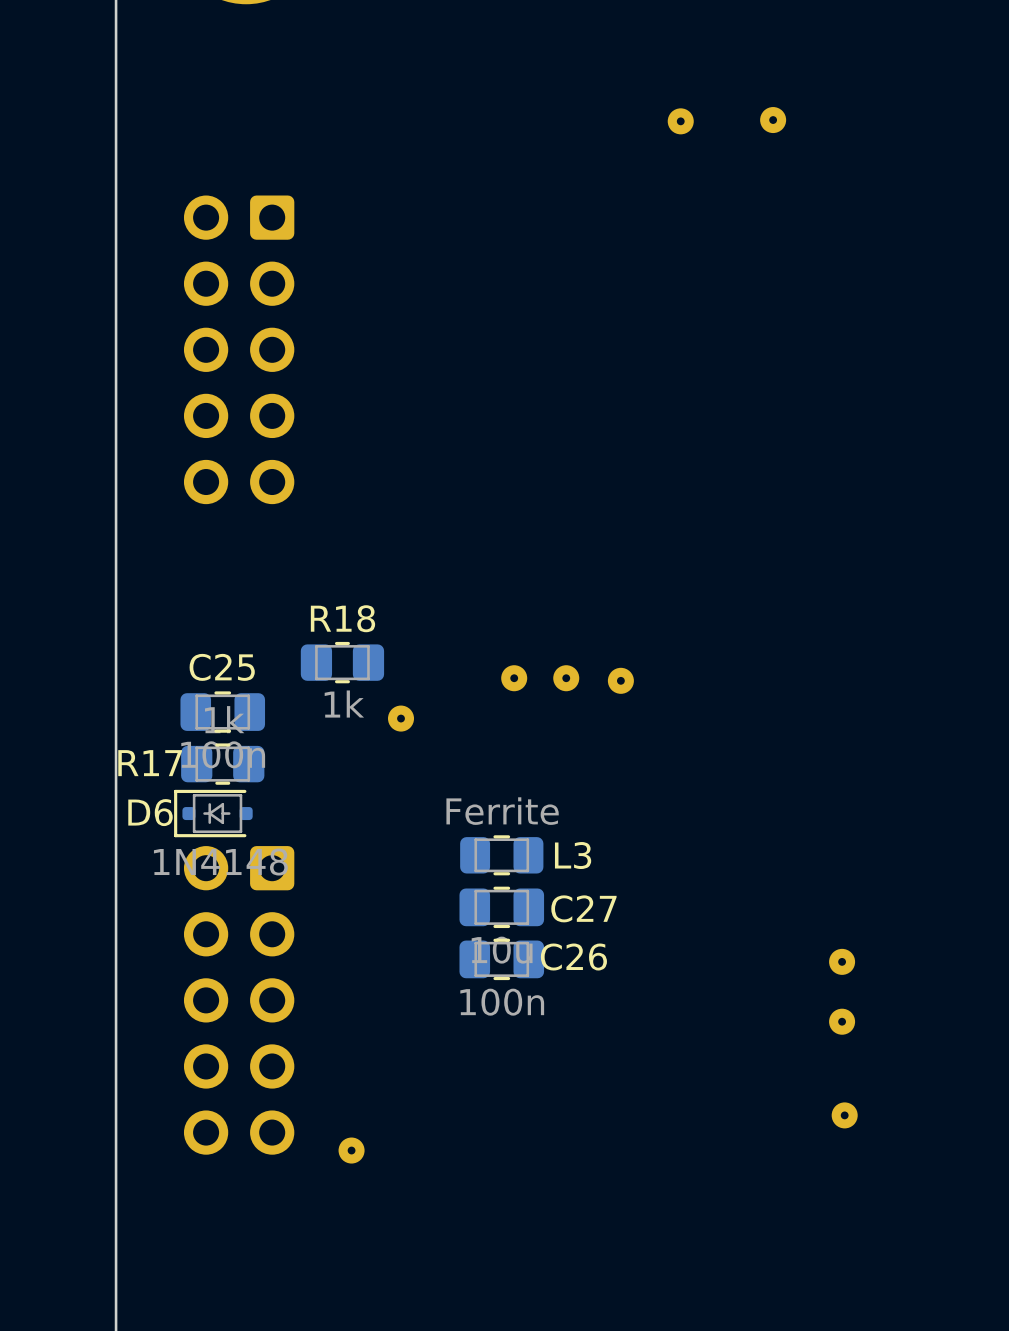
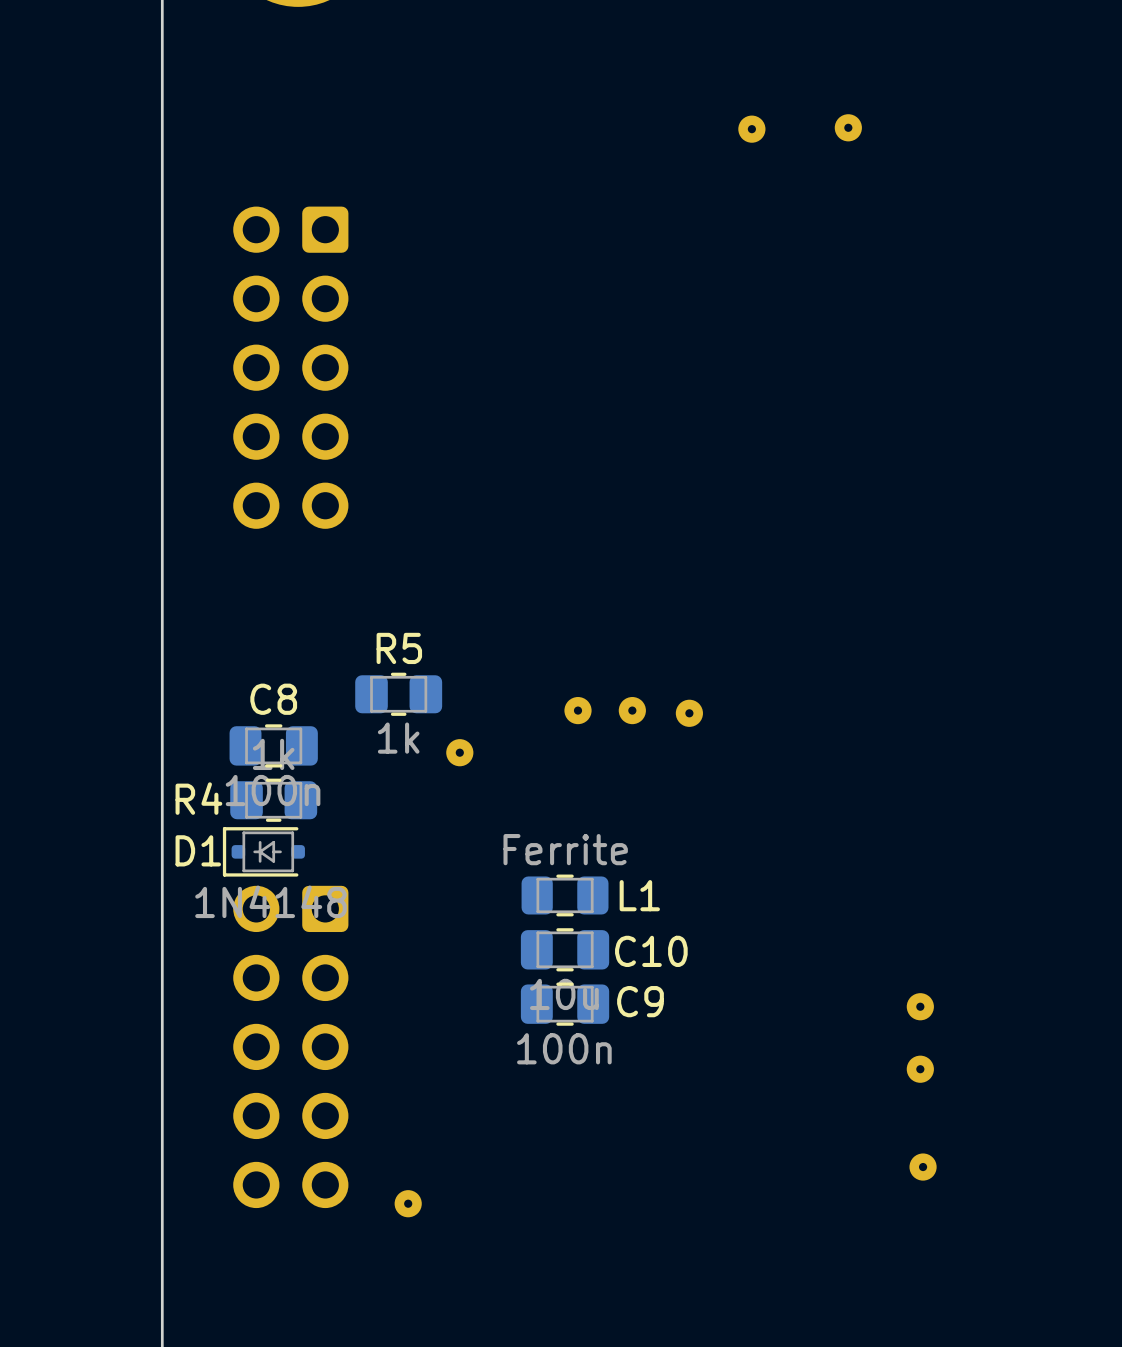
R18 name: R18 (342, 618) -> R5 (399, 648)
C25 name: C25 (222, 667) -> C8 (273, 699)
R17 name: R17 (150, 763) -> R4 (198, 798)
D6 name: D6 (150, 812) -> D1 (198, 850)
L3 name: L3 (573, 855) -> L1 (639, 895)
C27 name: C27 (583, 908) -> C10 (651, 951)
C26 name: C26 (573, 957) -> C9 (640, 1001)

